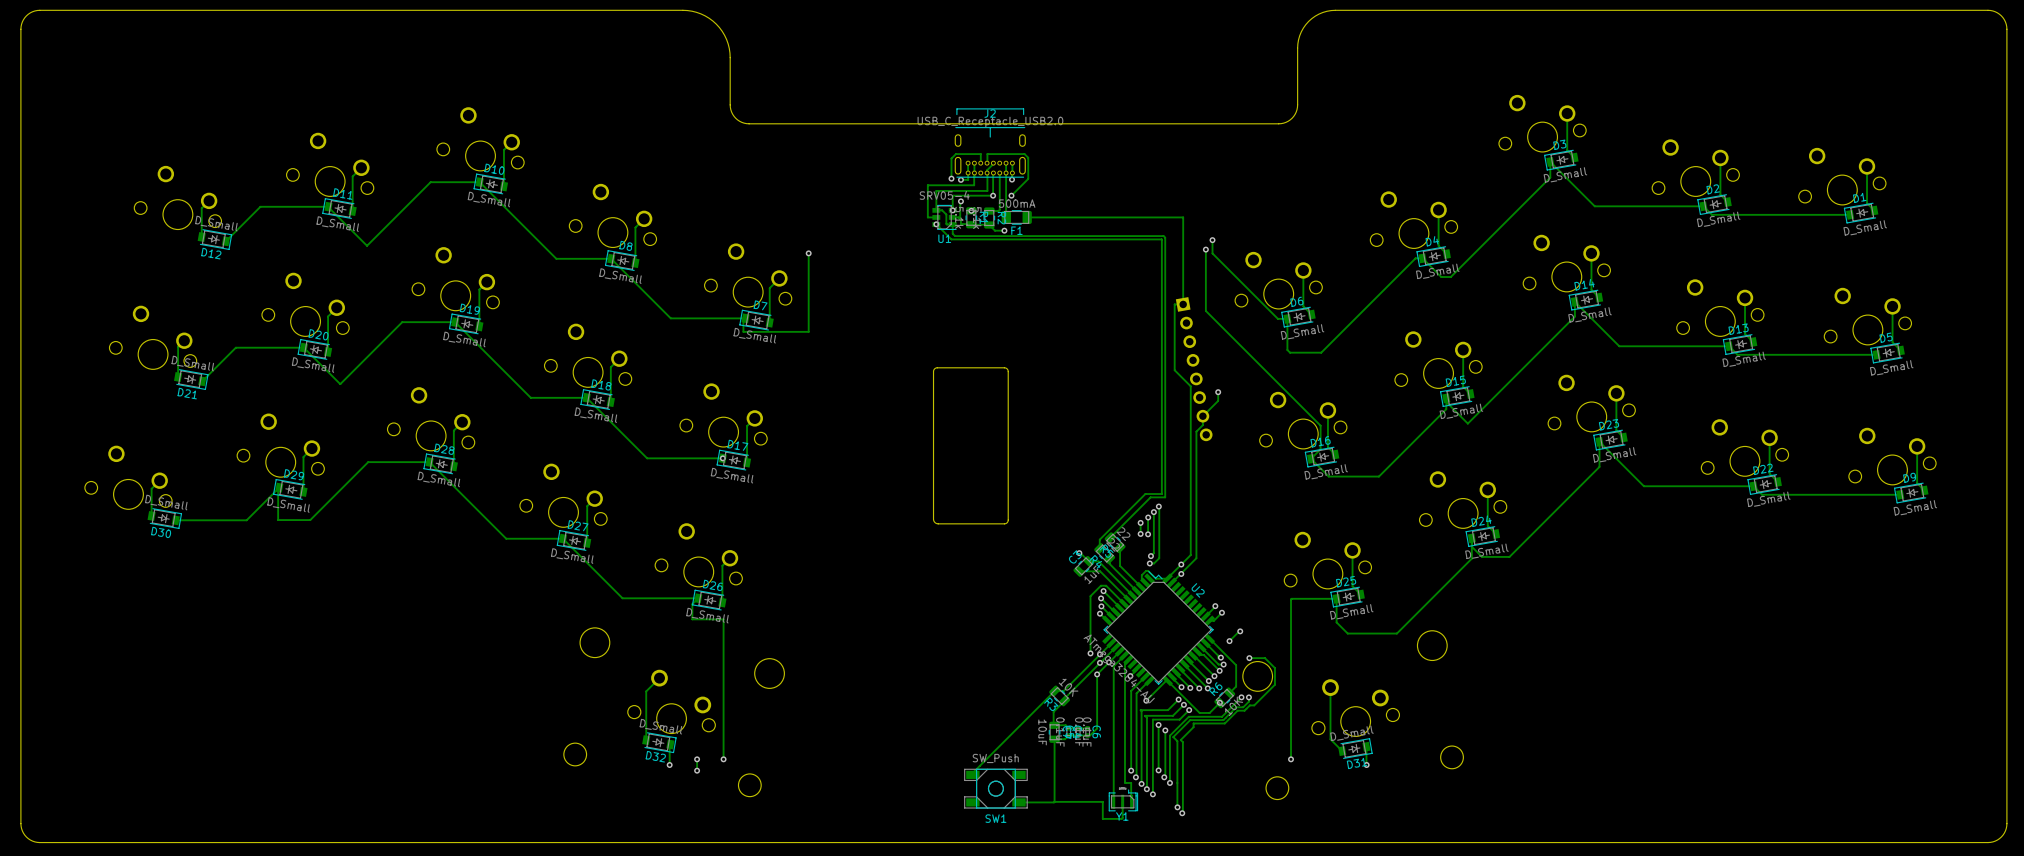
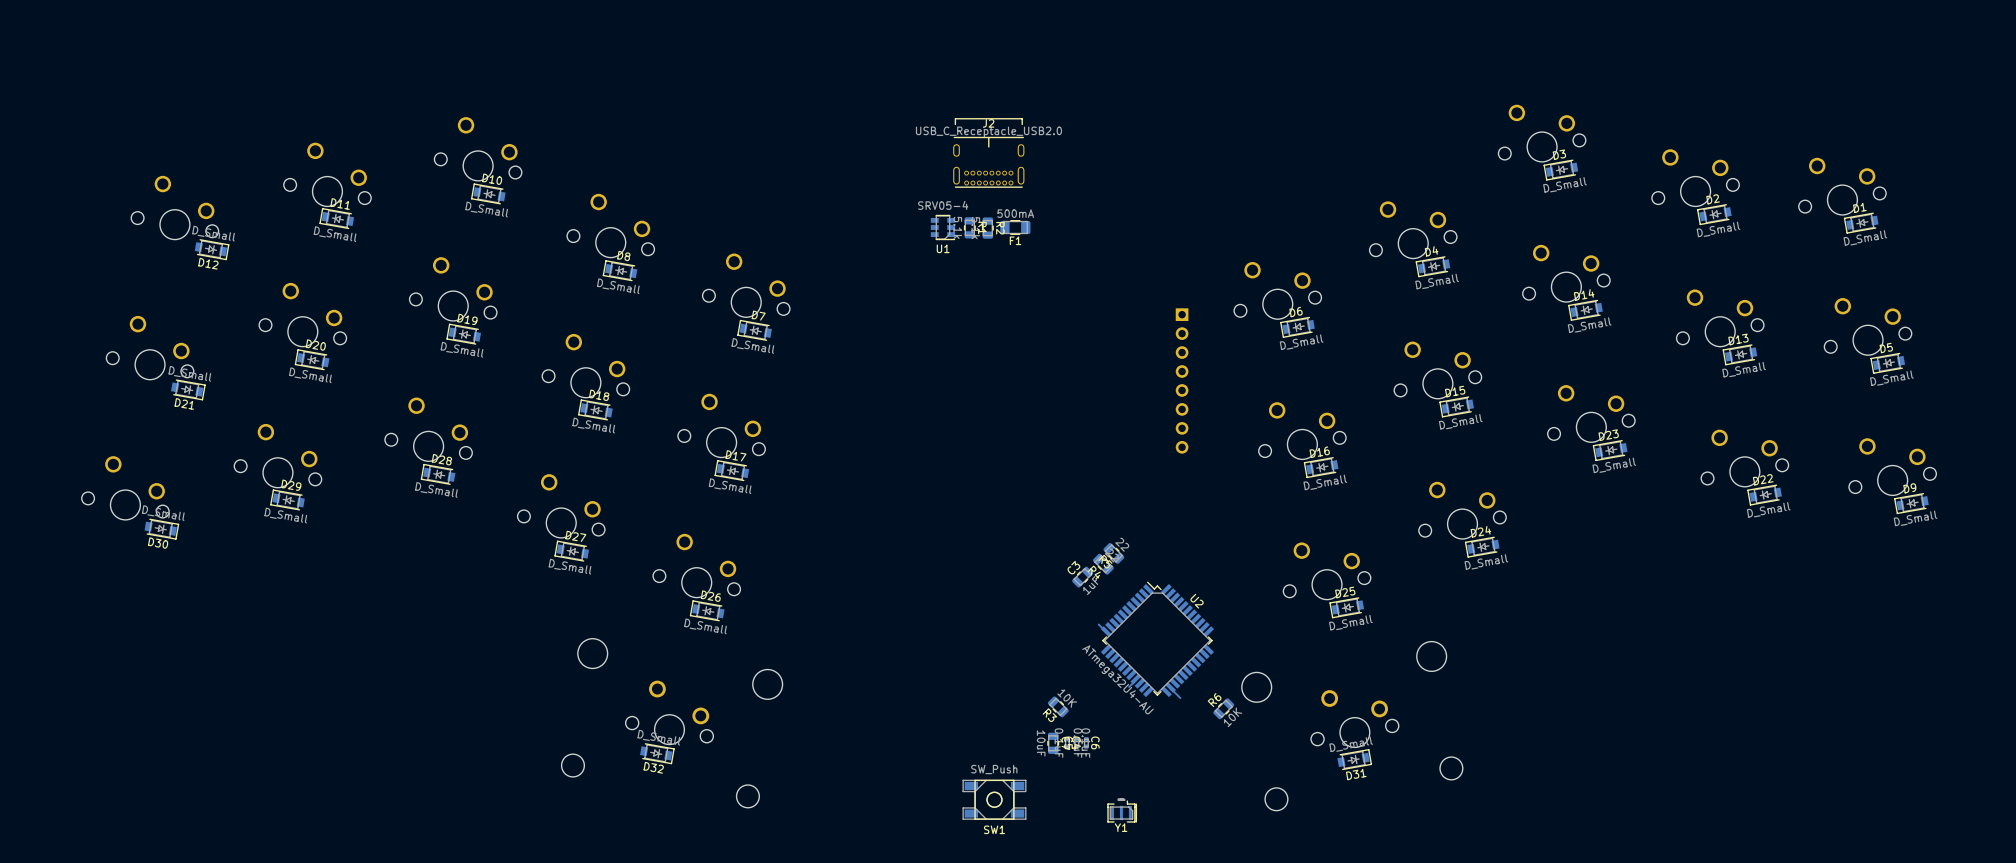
board edge: (1987, 10) (1331, 10) (1315, 16) (1301, 31) (1297, 43) (1296, 109) (1290, 119) (1278, 123) (746, 123) (737, 119) (730, 109) (729, 52) (724, 35) (709, 18) (687, 10) (32, 11) (24, 17) (20, 29) (22, 830) (28, 838) (39, 842) (1995, 841) (2004, 833) (2006, 823) (2006, 29) (2001, 15) (1987, 10) -> none
track: (1567, 113) (1567, 150) (1574, 157) -> none
track: (511, 142) (503, 150) (503, 186) -> none
track: (1720, 157) (1720, 194) (1727, 202) -> none
track: (974, 162) (974, 185) (927, 185) (927, 217) (936, 217) -> none
track: (968, 163) (968, 172) -> none
track: (980, 163) (980, 154) (955, 154) (951, 158) (951, 178) -> none
track: (987, 163) (987, 154) (1024, 154) (1028, 157) (1028, 178) (1011, 195) -> none
track: (993, 163) (987, 170) (987, 190) (936, 190) (936, 210) (942, 210) (946, 214) (946, 223) (952, 224) (952, 233) (954, 236) (1163, 236) (1165, 237) (1165, 497) (1150, 497) (1110, 537) -> none
track: (1006, 163) (1006, 217) -> none
track: (1012, 163) (1012, 179) -> none
track: (1867, 166) (1867, 203) (1874, 210) -> none
track: (361, 167) (352, 176) (352, 211) -> none
track: (968, 173) (968, 179) (960, 179) -> none
track: (993, 173) (993, 195) (953, 195) (952, 210) -> none
track: (999, 173) (999, 209) (989, 211) -> none
via: (951, 178) -> none
via: (960, 179) -> none
via: (1012, 179) -> none
via: (993, 195) -> none
via: (1011, 195) -> none
track: (209, 200) (201, 208) (201, 237) -> none
track: (960, 201) (960, 219) -> none
via: (960, 201) -> none
track: (1438, 209) (1438, 245) (1446, 254) -> none
via: (952, 210) -> none
via: (971, 210) -> none
track: (1850, 214) (1712, 214) (1703, 206) (1594, 206) (1550, 161) (1550, 177) (1450, 277) (1441, 277) (1422, 258) (1415, 258) (1321, 352) (1290, 352) (1287, 350) (1287, 318) (1277, 318) (1212, 253) (1212, 240) -> none
track: (952, 217) (958, 217) (960, 224) (989, 224) (994, 230) (1004, 230) -> none
track: (1027, 217) (1183, 217) (1183, 304) (1174, 304) (1174, 370) (1190, 386) (1190, 555) (1167, 578) (1155, 578) (1146, 570) (1141, 575) (1141, 579) (1145, 582) -> none
track: (644, 218) (635, 227) (635, 263) -> none
track: (936, 224) (951, 239) (1161, 239) (1161, 494) (1145, 494) (1099, 539) (1099, 548) -> none
via: (936, 224) -> none
via: (1004, 230) -> none
via: (1212, 240) -> none
track: (225, 241) (260, 206) (328, 206) (367, 245) (430, 182) (479, 182) (556, 258) (611, 258) (670, 318) (745, 318) (743, 320) (743, 331) (808, 331) (808, 253) -> none
track: (1205, 249) (1205, 310) (1320, 425) (1320, 449) (1311, 458) (1328, 476) (1378, 476) (1446, 409) (1446, 398) -> none
via: (1205, 249) -> none
via: (808, 253) -> none
track: (1591, 253) (1591, 289) (1599, 297) -> none
track: (1303, 270) (1303, 306) (1311, 314) -> none
track: (779, 278) (769, 288) (769, 322) -> none
track: (486, 282) (479, 289) (479, 326) -> none
track: (1745, 297) (1745, 333) (1753, 342) -> none
track: (1892, 306) (1892, 342) (1900, 350) -> none
track: (336, 307) (328, 316) (328, 351) -> none
track: (184, 340) (178, 346) (178, 377) -> none
track: (1463, 349) (1463, 386) (1470, 394) -> none
track: (1876, 354) (1737, 354) (1729, 346) (1619, 346) (1574, 301) (1574, 316) (1467, 423) (1446, 402) -> none
track: (619, 358) (610, 367) (610, 402) -> none
part: (1194, 369) -> none
part: none -> (1182, 380)
track: (202, 381) (235, 347) (303, 347) (340, 383) (402, 322) (455, 322) (530, 397) (586, 397) (647, 458) (722, 458) -> none
track: (1218, 392) (1218, 400) (1202, 416) (1202, 425) (1196, 431) (1196, 558) (1171, 582) -> none
via: (1218, 392) -> none
track: (1616, 393) (1616, 430) (1623, 437) -> none
track: (1327, 410) (1327, 447) (1335, 454) -> none
track: (754, 418) (747, 426) (747, 462) -> none
track: (462, 422) (453, 430) (453, 466) -> none
track: (1769, 437) (1769, 473) (1777, 481) -> none
track: (1917, 446) (1917, 483) (1924, 490) -> none
track: (311, 448) (303, 457) (303, 491) -> none
via: (722, 458) -> none
track: (159, 480) (151, 488) (151, 516) -> none
track: (279, 487) (246, 520) (175, 520) -> none
track: (278, 488) (278, 520) (310, 520) (368, 462) (429, 462) (506, 538) (562, 538) (622, 598) (698, 598) (692, 604) (692, 619) (723, 619) (723, 759) -> none
track: (1487, 489) (1487, 525) (1496, 534) -> none
track: (1900, 494) (1762, 494) (1753, 486) (1643, 486) (1599, 441) (1599, 466) (1509, 556) (1482, 556) (1471, 546) -> none
track: (594, 498) (587, 506) (587, 543) -> none
track: (1158, 506) (1159, 558) (1154, 563) (1149, 563) -> none
via: (1158, 506) -> none
track: (1153, 512) (1153, 553) (1150, 556) -> none
via: (1153, 512) -> none
track: (1148, 517) (1148, 534) -> none
via: (1148, 517) -> none
board edge: (933, 519) (933, 370) (937, 367) (1005, 368) (1008, 371) (1007, 521) (1004, 523) (938, 523) (933, 519) -> none
track: (1140, 522) (1140, 533) -> none
via: (1140, 522) -> none
via: (1140, 533) -> none
via: (1148, 534) -> none
track: (1471, 538) (1471, 558) (1396, 633) (1347, 633) (1336, 622) (1336, 598) (1291, 599) (1291, 759) -> none
track: (1120, 547) (1120, 565) (1141, 587) -> none
track: (1352, 550) (1352, 586) (1360, 594) -> none
track: (1079, 553) (1088, 561) (1098, 561) (1132, 595) -> none
via: (1079, 553) -> none
via: (1150, 556) -> none
track: (729, 558) (722, 565) (722, 602) -> none
track: (1109, 558) (1109, 563) (1137, 591) -> none
via: (1149, 563) -> none
via: (1181, 564) -> none
track: (1078, 571) (1100, 571) (1128, 599) -> none
via: (1181, 573) -> none
track: (1103, 591) (1120, 608) -> none
via: (1103, 591) -> none
track: (1101, 598) (1115, 612) -> none
via: (1101, 598) -> none
track: (1124, 603) (1106, 585) (1100, 585) (1090, 596) (1090, 653) -> none
track: (1101, 606) (1111, 616) -> none
via: (1101, 606) -> none
track: (1215, 606) (1205, 616) -> none
via: (1215, 606) -> none
track: (1221, 612) (1213, 620) (1209, 620) -> none
via: (1221, 612) -> none
via: (1099, 613) -> none
track: (1240, 631) (1229, 641) -> none
via: (1240, 631) -> none
track: (1209, 638) (1236, 665) (1236, 686) (1229, 692) -> none
via: (1229, 641) -> none
track: (1111, 642) (1063, 691) (1054, 691) (973, 774) -> none
track: (1205, 642) (1218, 655) (1218, 658) -> none
track: (1115, 647) (1064, 698) -> none
track: (1201, 647) (1218, 664) (1223, 664) -> none
track: (1120, 651) (1097, 674) (1097, 728) (1090, 735) (1068, 735) (1065, 739) (1054, 739) (1054, 801) -> none
track: (1197, 651) (1203, 654) (1219, 670) -> none
via: (1090, 653) -> none
via: (1099, 654) -> none
track: (1124, 655) (1113, 666) (1113, 801) -> none
track: (1192, 655) (1214, 676) -> none
via: (1220, 657) -> none
track: (1249, 658) (1264, 658) (1274, 668) (1274, 684) (1254, 705) (1249, 705) (1244, 710) (1237, 710) (1224, 723) (1193, 723) (1193, 727) (1180, 740) (1182, 742) (1182, 813) -> none
via: (1249, 658) -> none
track: (1128, 659) (1124, 663) (1124, 782) (1131, 782) (1131, 801) -> none
track: (1188, 659) (1208, 681) -> none
via: (1099, 662) -> none
via: (1108, 662) -> none
track: (1184, 663) (1207, 688) -> none
via: (1223, 664) -> none
track: (1180, 668) (1199, 688) -> none
via: (1219, 670) -> none
track: (1175, 672) (1190, 687) -> none
via: (1097, 674) -> none
via: (1130, 676) -> none
track: (1145, 676) (1131, 690) (1131, 770) -> none
via: (1214, 676) -> none
track: (659, 678) (646, 691) (646, 740) -> none
track: (1149, 680) (1136, 693) (1135, 777) -> none
via: (1208, 681) -> none
via: (1181, 687) -> none
via: (1190, 687) -> none
track: (1330, 687) (1330, 739) (1342, 751) -> none
via: (1199, 688) -> none
via: (1207, 688) -> none
track: (1241, 697) (1222, 716) (1188, 716) (1169, 735) (1169, 782) -> none
via: (1241, 697) -> none
track: (1248, 697) (1248, 701) (1243, 707) (1236, 707) (1223, 720) (1190, 720) (1173, 737) (1177, 741) (1177, 807) -> none
via: (1248, 697) -> none
track: (1178, 699) (1168, 710) (1140, 710) (1141, 783) -> none
via: (1178, 699) -> none
track: (1064, 700) (1053, 711) (1053, 724) (1065, 725) (1068, 728) (1087, 728) -> none
track: (1146, 700) (1167, 680) (1199, 712) (1209, 712) (1219, 702) -> none
via: (1146, 700) -> none
via: (1219, 702) -> none
track: (1183, 704) (1172, 715) (1144, 715) (1146, 717) (1146, 789) -> none
via: (1183, 704) -> none
track: (1189, 710) (1179, 719) (1152, 719) (1152, 794) -> none
via: (1189, 710) -> none
track: (1158, 725) (1158, 770) -> none
via: (1158, 725) -> none
track: (1165, 730) (1164, 777) -> none
via: (1165, 730) -> none
track: (670, 744) (669, 765) -> none
track: (1366, 746) (1366, 765) -> none
track: (697, 759) (697, 770) -> none
via: (697, 759) -> none
via: (723, 759) -> none
via: (1291, 759) -> none
via: (669, 765) -> none
via: (1366, 765) -> none
via: (697, 770) -> none
via: (1131, 770) -> none
via: (1158, 770) -> none
via: (1135, 777) -> none
via: (1164, 777) -> none
via: (1169, 782) -> none
via: (1141, 783) -> none
via: (1146, 789) -> none
via: (1152, 794) -> none
track: (1054, 801) (1019, 802) -> none
track: (1122, 801) (1121, 818) (1102, 818) (1102, 801) (1054, 801) -> none
via: (1177, 807) -> none
via: (1182, 813) -> none

